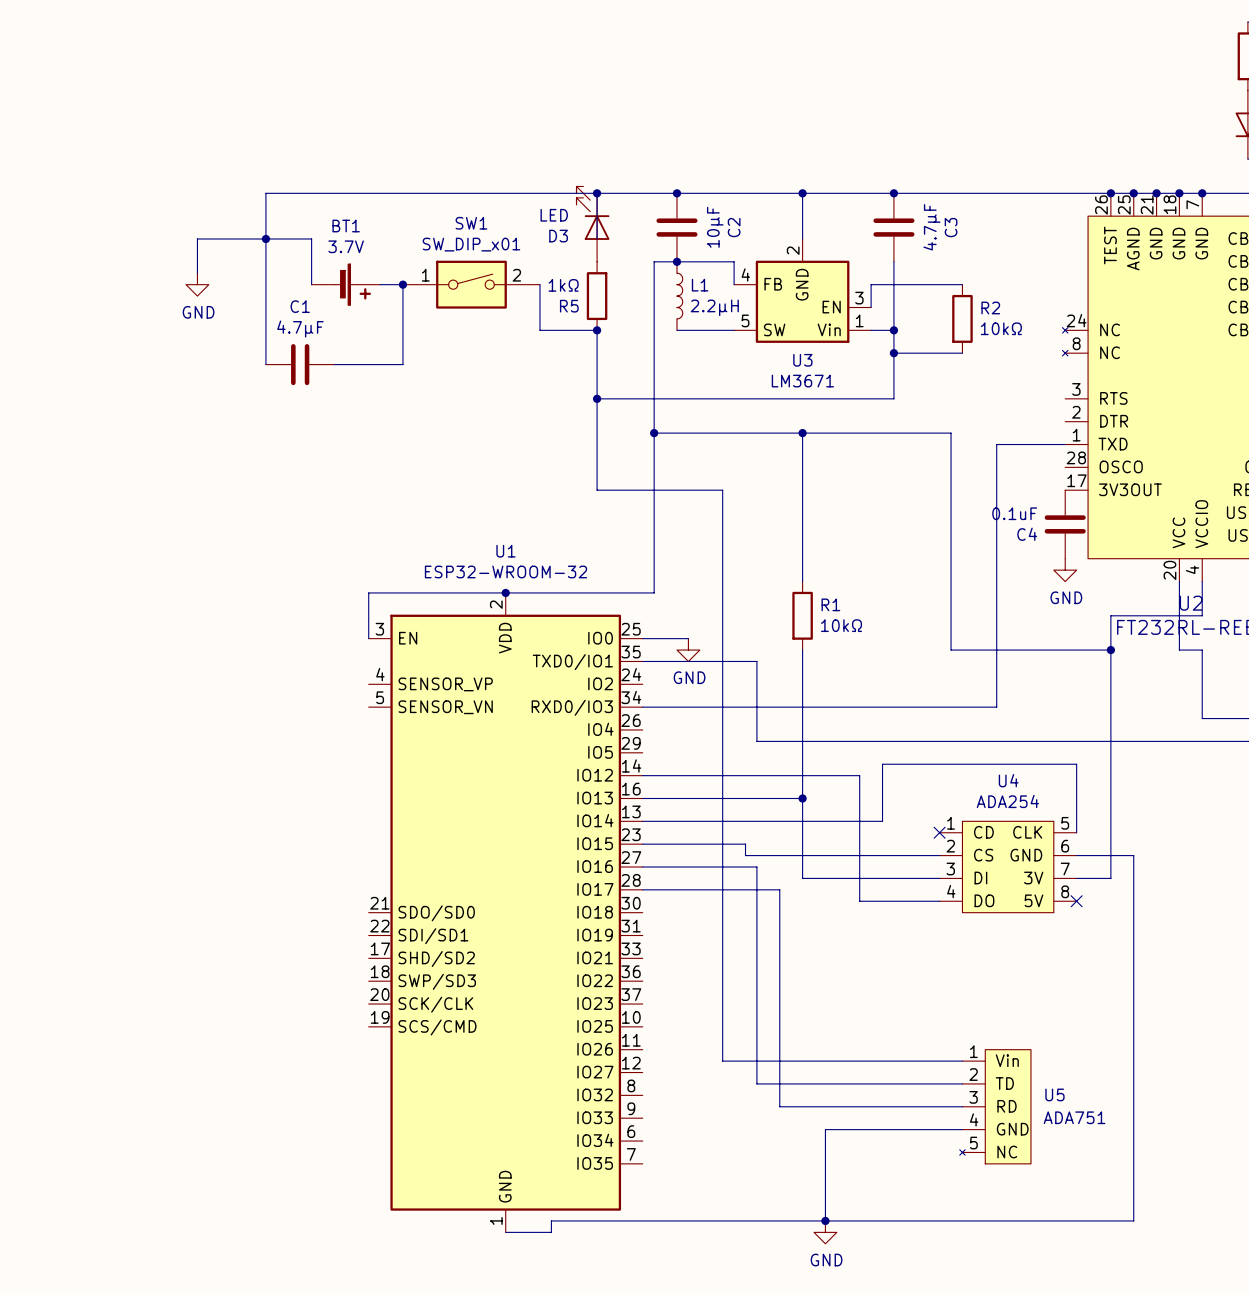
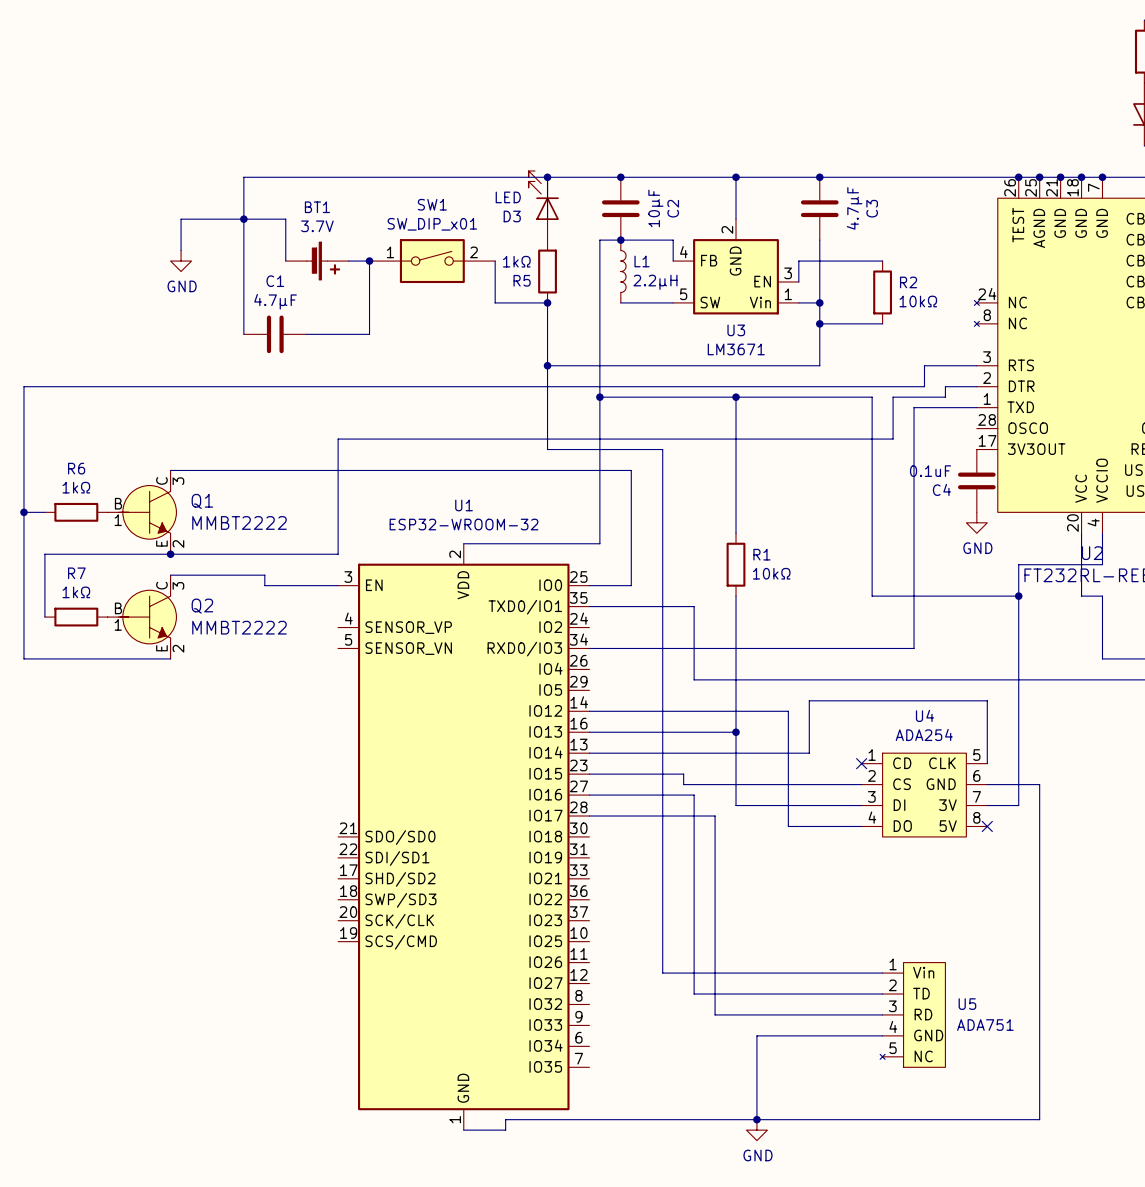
wire: none -> (976, 365) (924, 365) (924, 386) (23, 386) (23, 658) (170, 658)
wire: none -> (170, 470) (631, 470) (631, 585)
wire: none -> (23, 512) (44, 512)
junction: none -> (23, 512)
R6: none -> 1kΩ (76, 512)
Q1: none -> MMBT2222 (142, 512)
wire: (368, 592) (505, 592) -> (338, 543) (338, 439) (893, 439) (893, 397) (945, 397) (945, 386) (976, 386)
junction: (505, 592) -> none
junction: none -> (170, 554)
wire: (368, 604) (368, 638) -> (170, 575) (264, 575) (264, 585) (338, 585)
wire: none -> (338, 554) (44, 554) (44, 617)
power symbol: GND (688, 650) -> none
R7: none -> 1kΩ (76, 617)
Q2: none -> MMBT2222 (142, 617)

